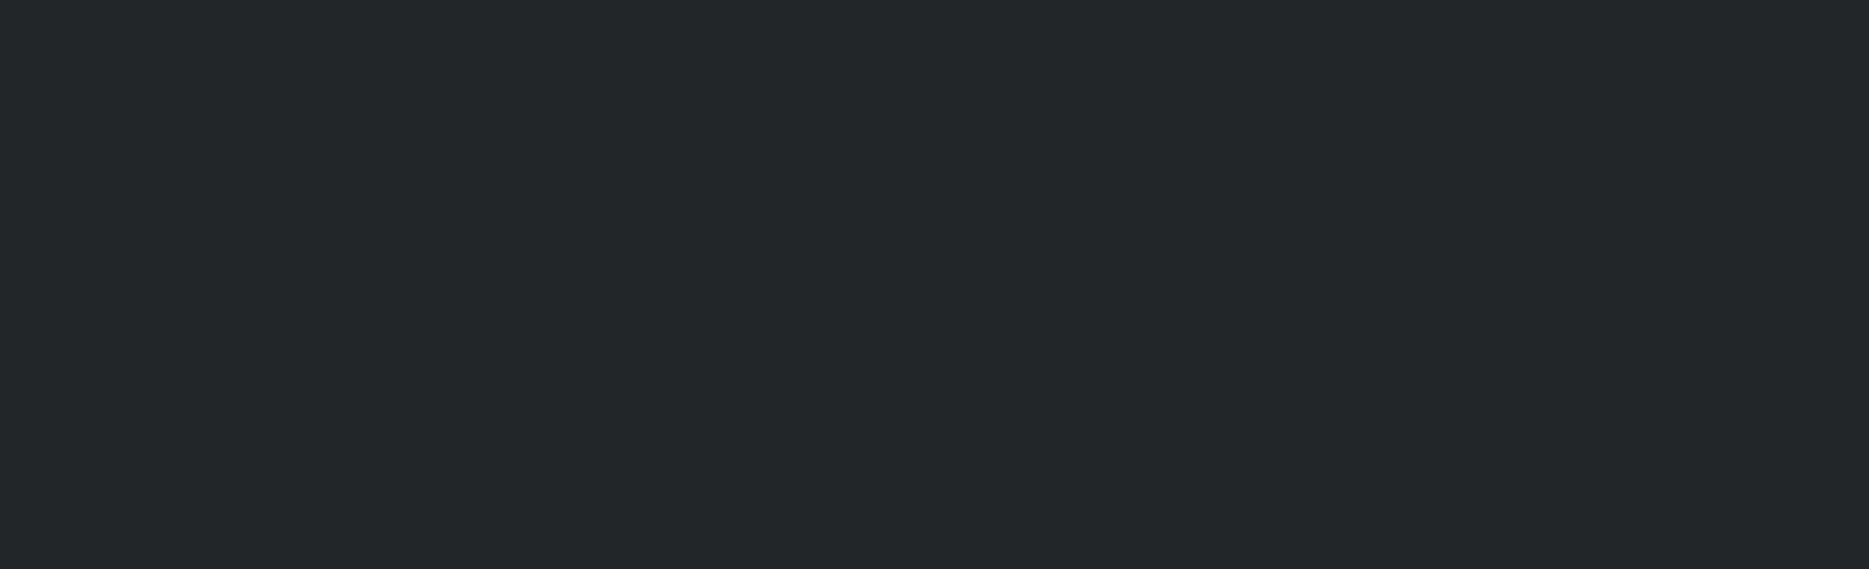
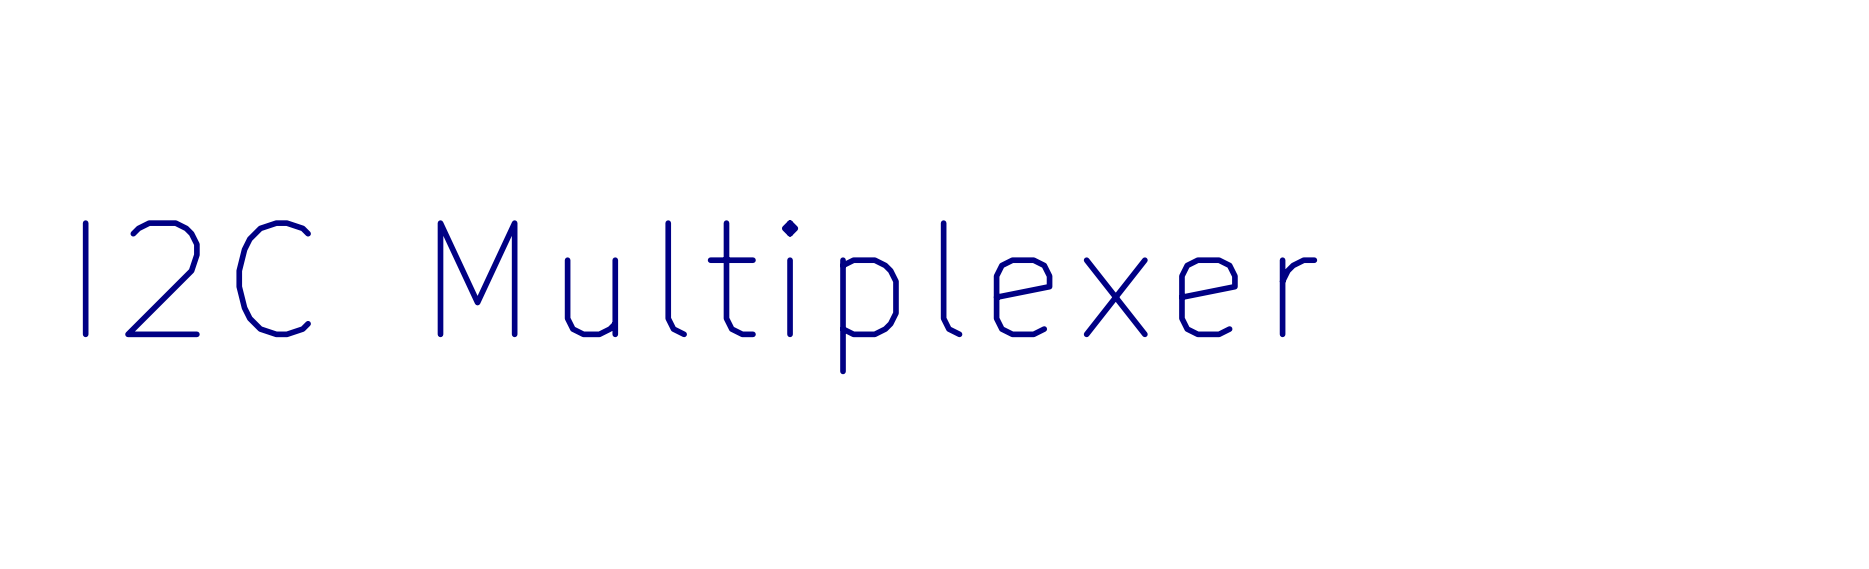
text: none -> I2C Multiplexer (700, 297)

